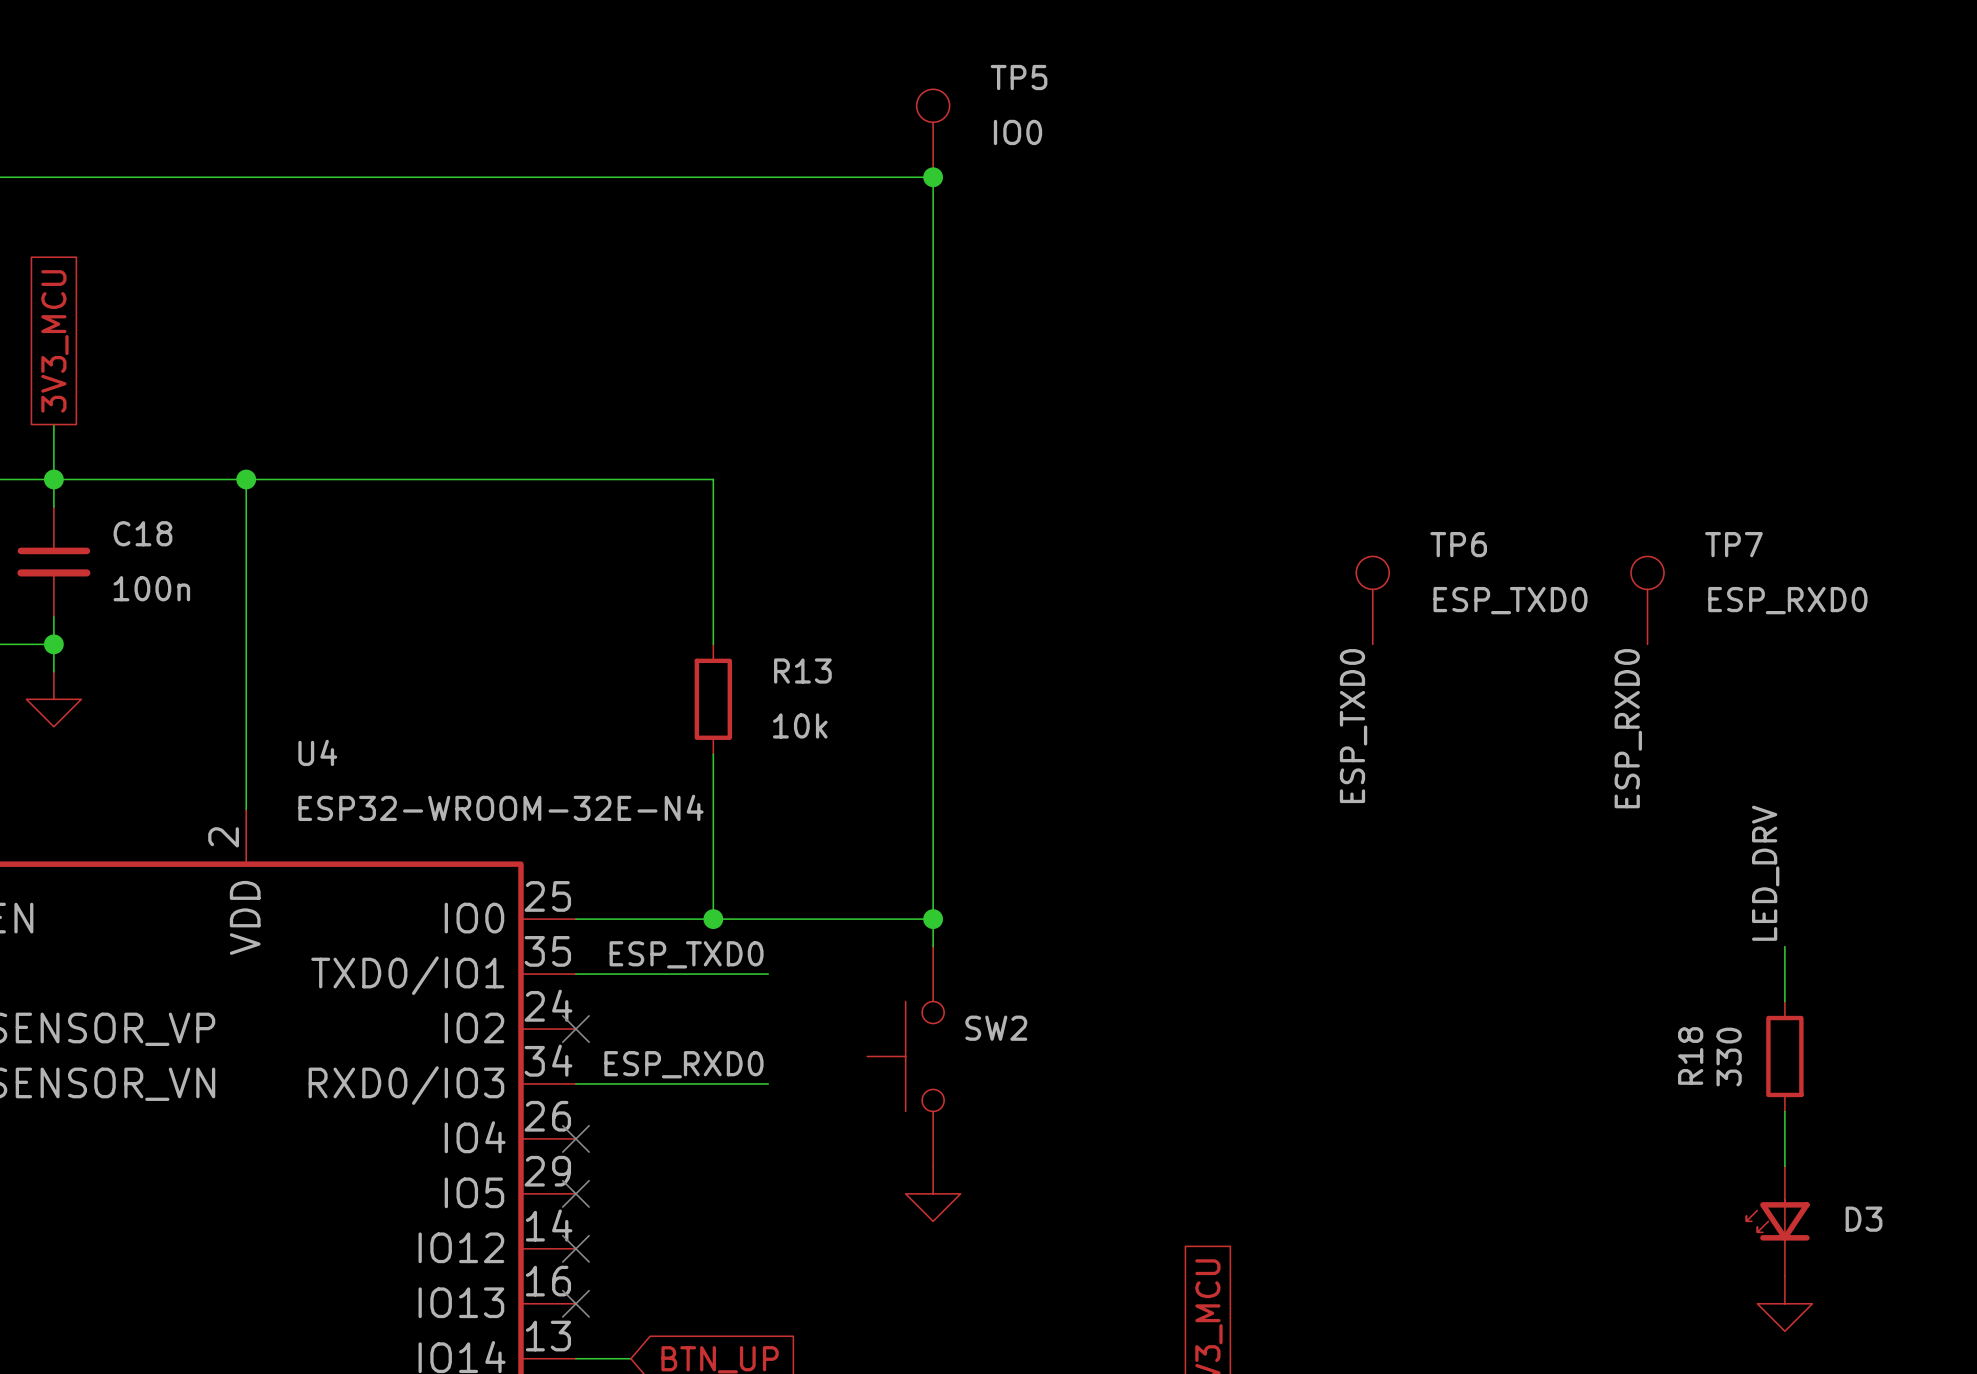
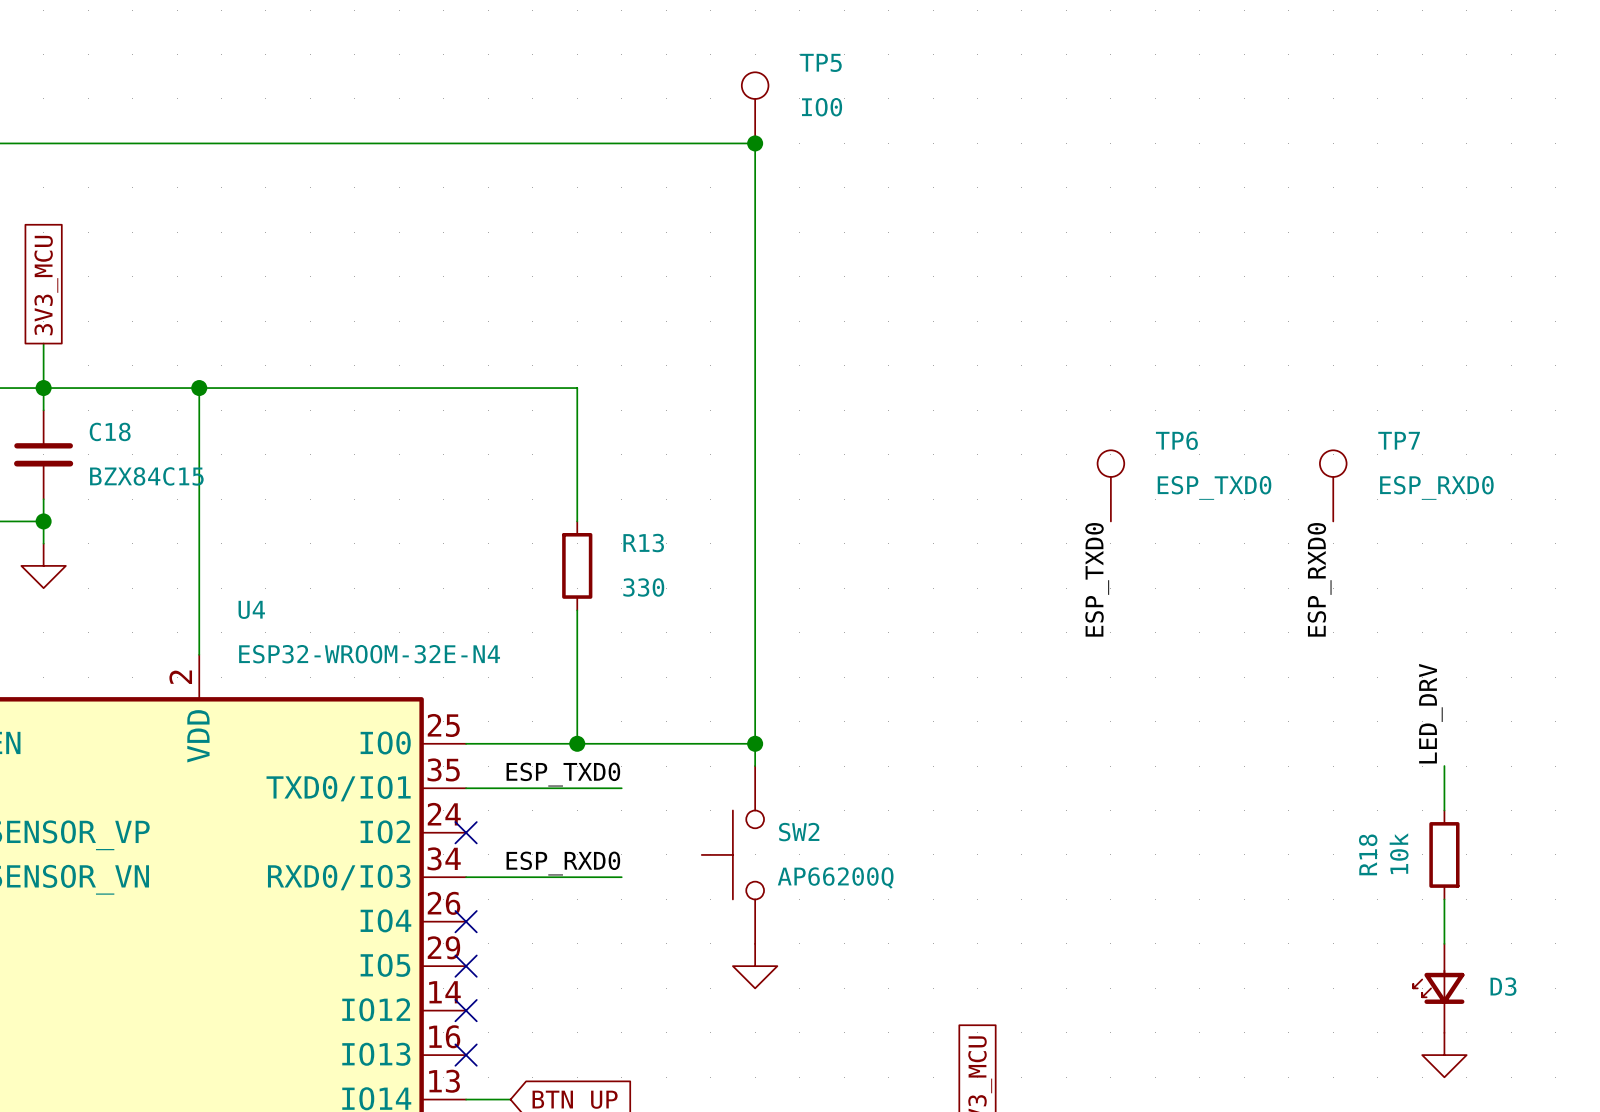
C18 value: 100n (151, 588) -> BZX84C15 (146, 476)
R13 value: 10k (800, 725) -> 330 (643, 587)
R18 value: 330 (1729, 1057) -> 10k (1399, 853)
SW2 value: none -> AP66200Q (835, 877)

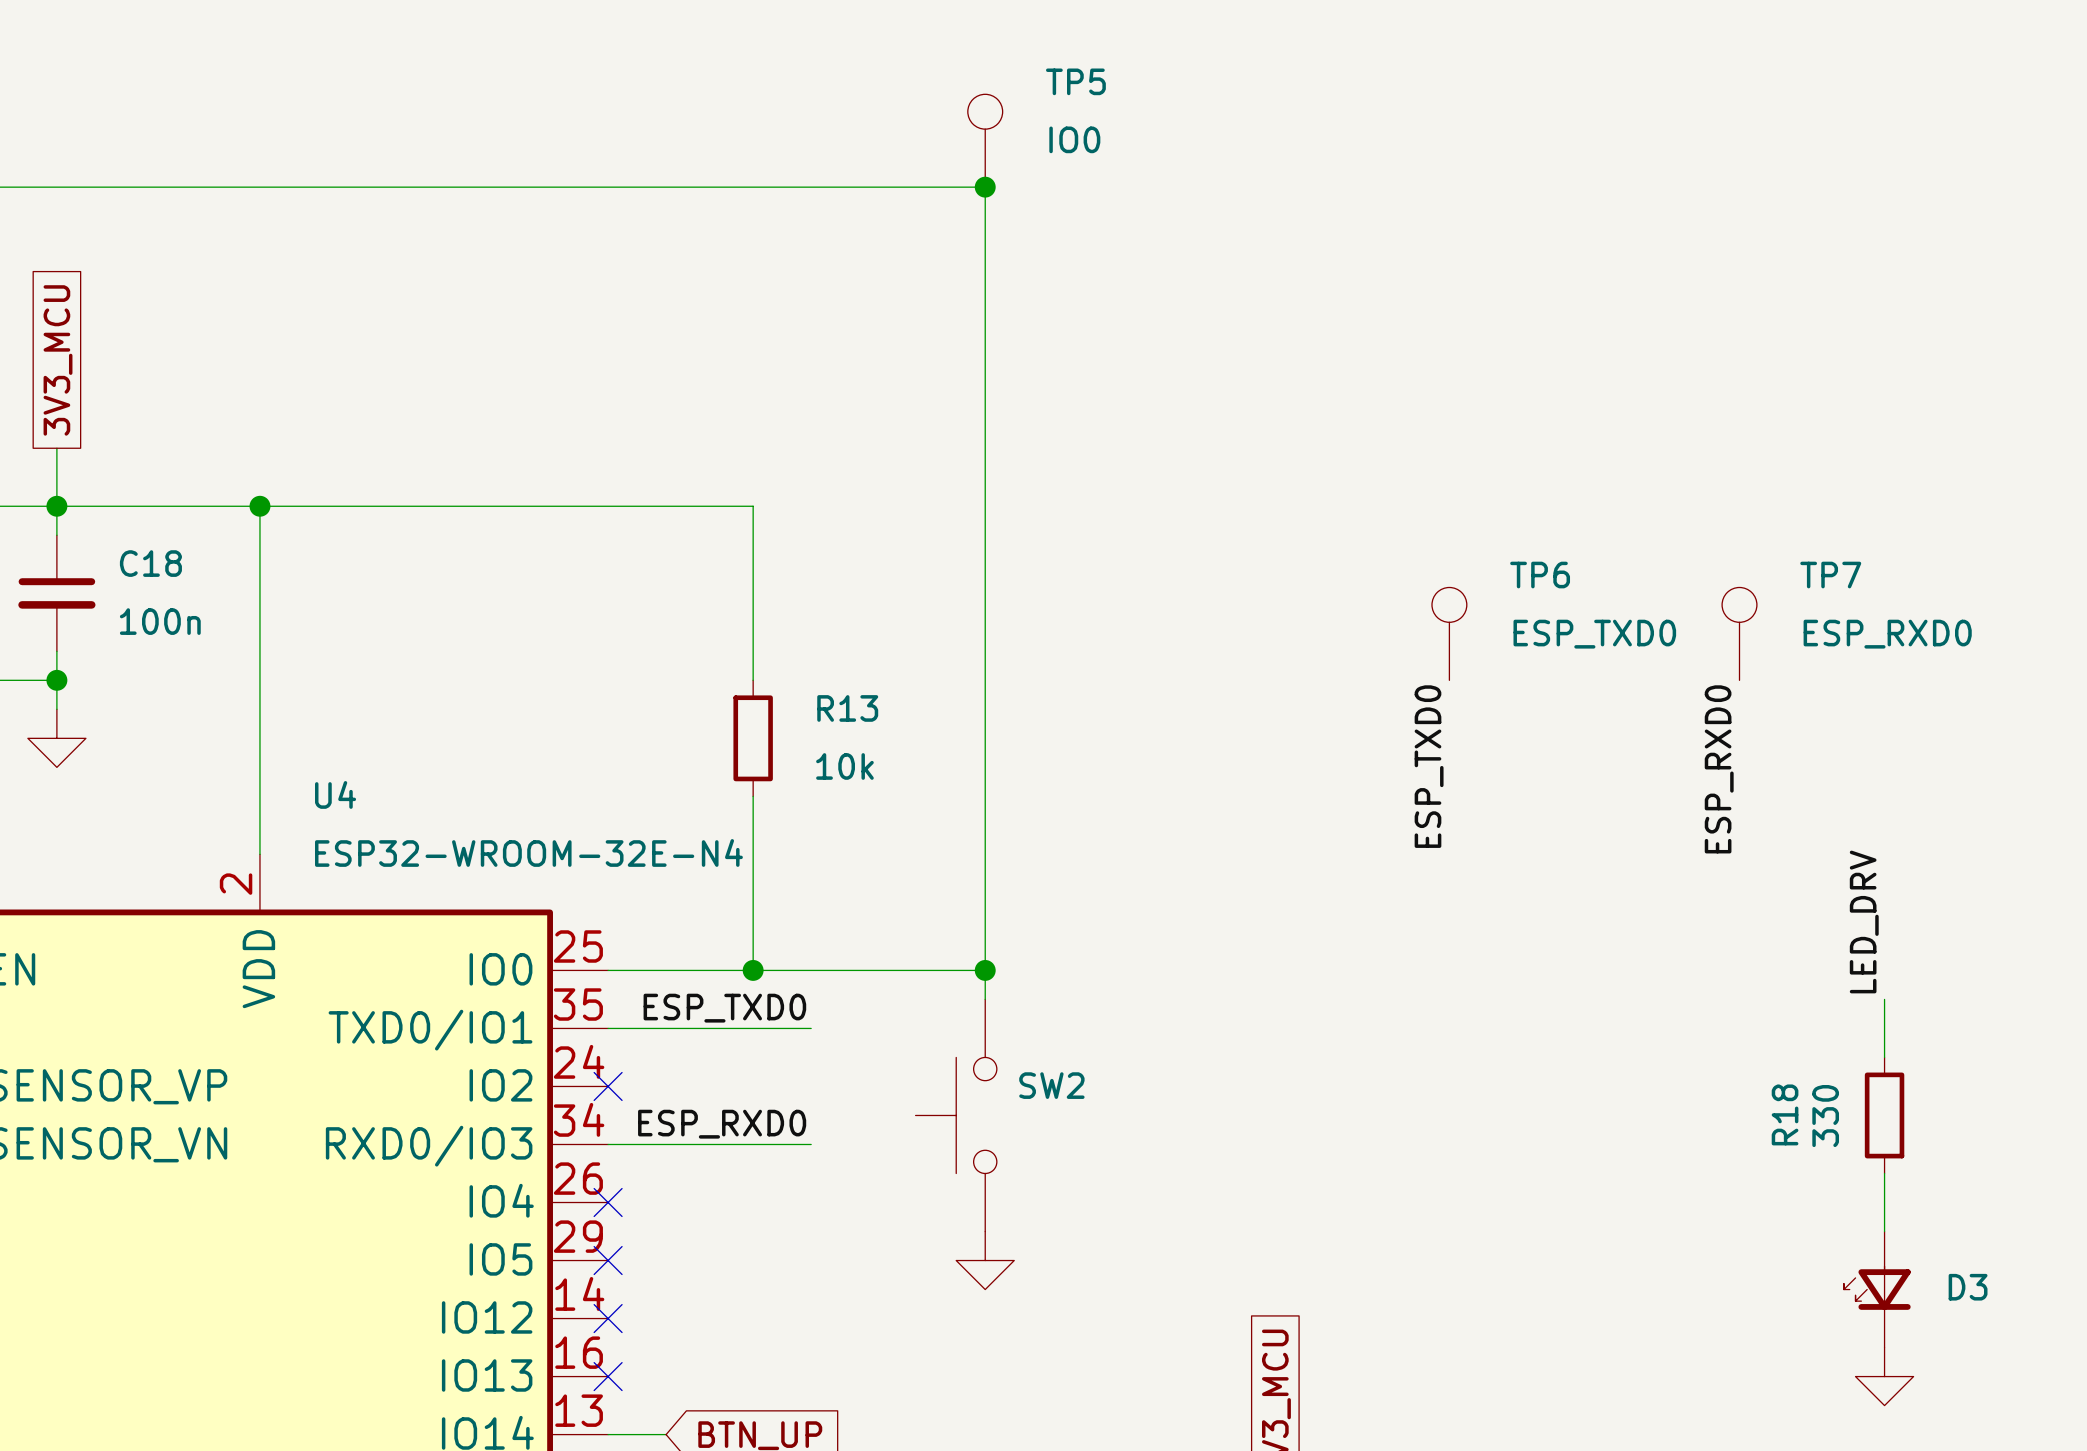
C18 value: BZX84C15 (146, 476) -> 100n (160, 621)
R13 value: 330 (643, 587) -> 10k (844, 766)
R18 value: 10k (1399, 853) -> 330 (1825, 1116)
SW2 value: AP66200Q (835, 877) -> none

